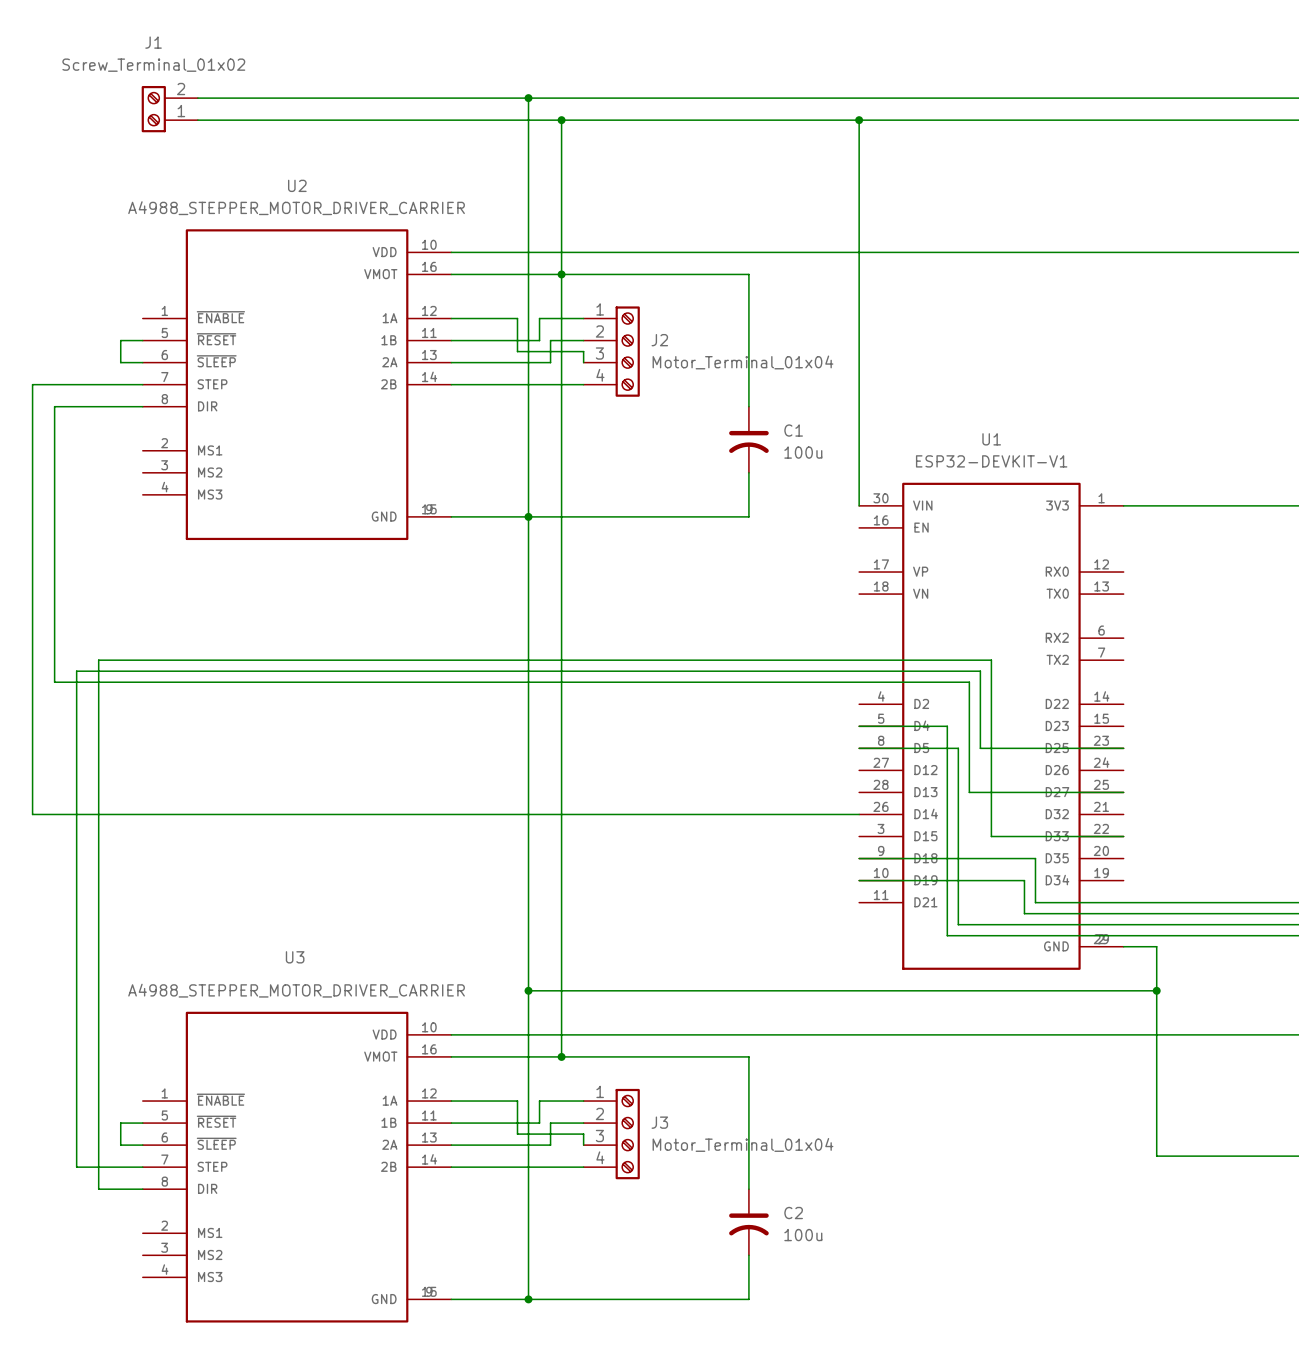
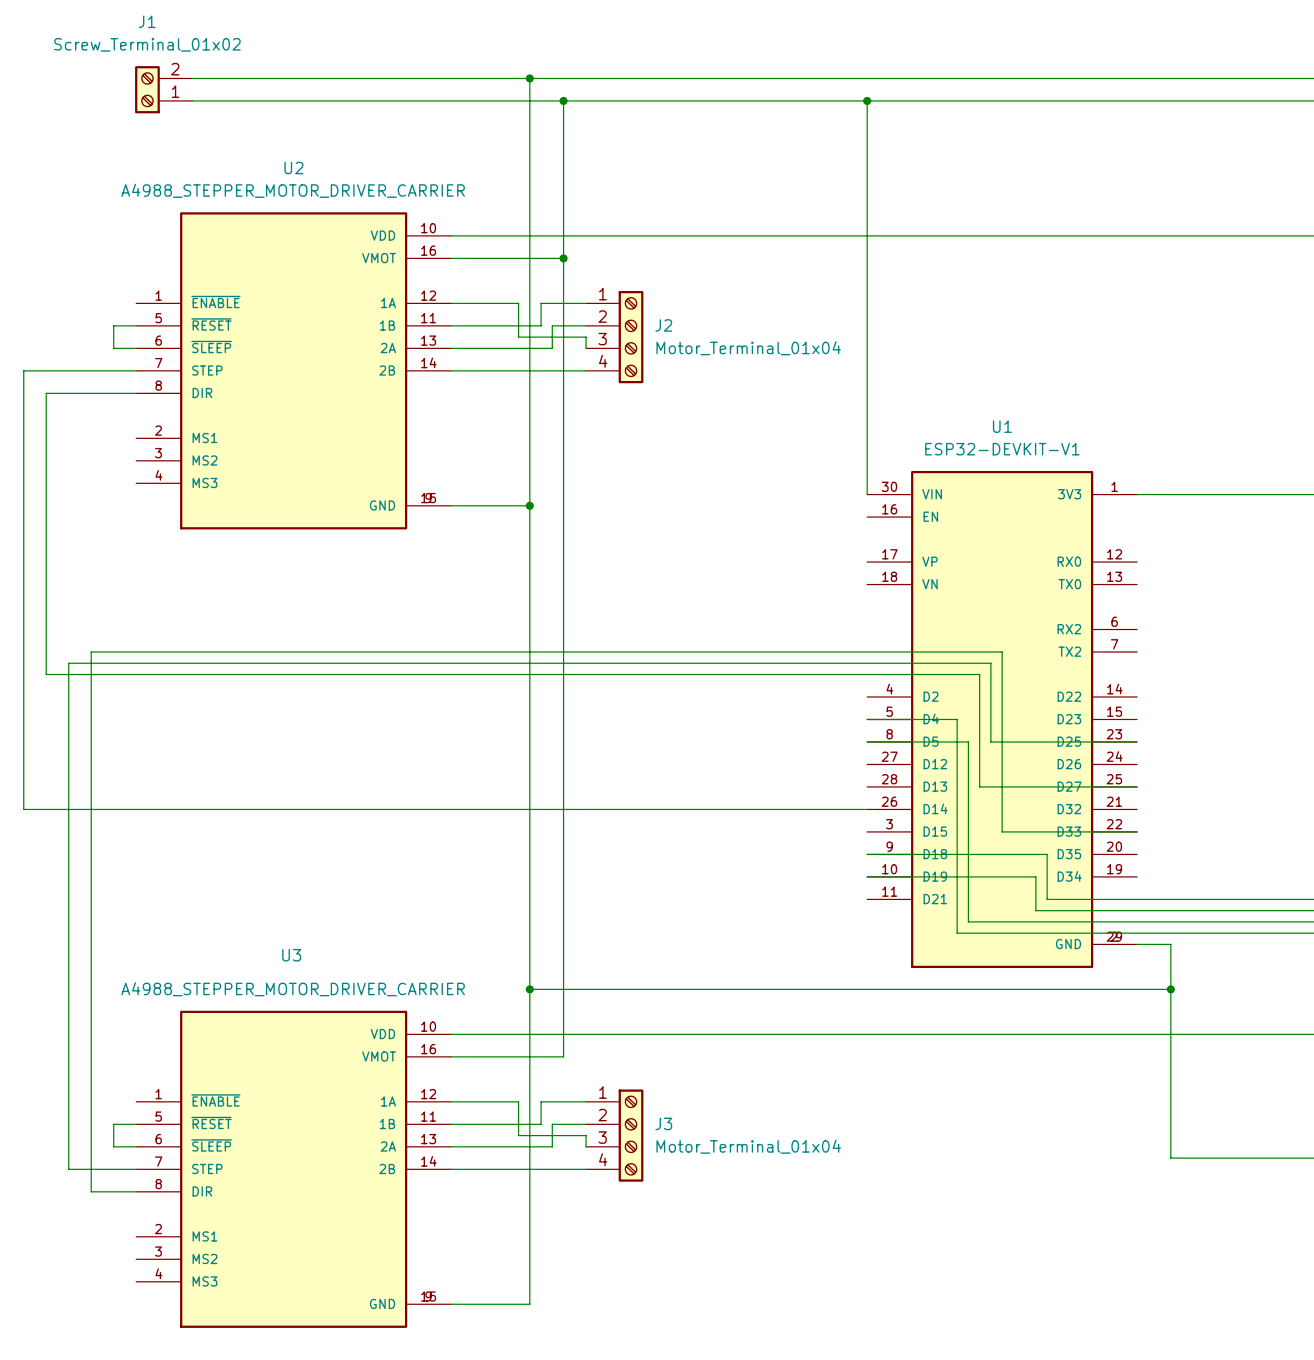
wire: (561, 274) (748, 274) (748, 406) -> none
C1: 100u (748, 439) -> none
wire: (748, 472) (748, 516) (528, 516) -> none
wire: (561, 1056) (748, 1056) (748, 1189) -> none
junction: (561, 1056) -> none
C2: 100u (748, 1222) -> none
wire: (748, 1255) (748, 1299) (528, 1299) -> none
junction: (528, 1299) -> none

